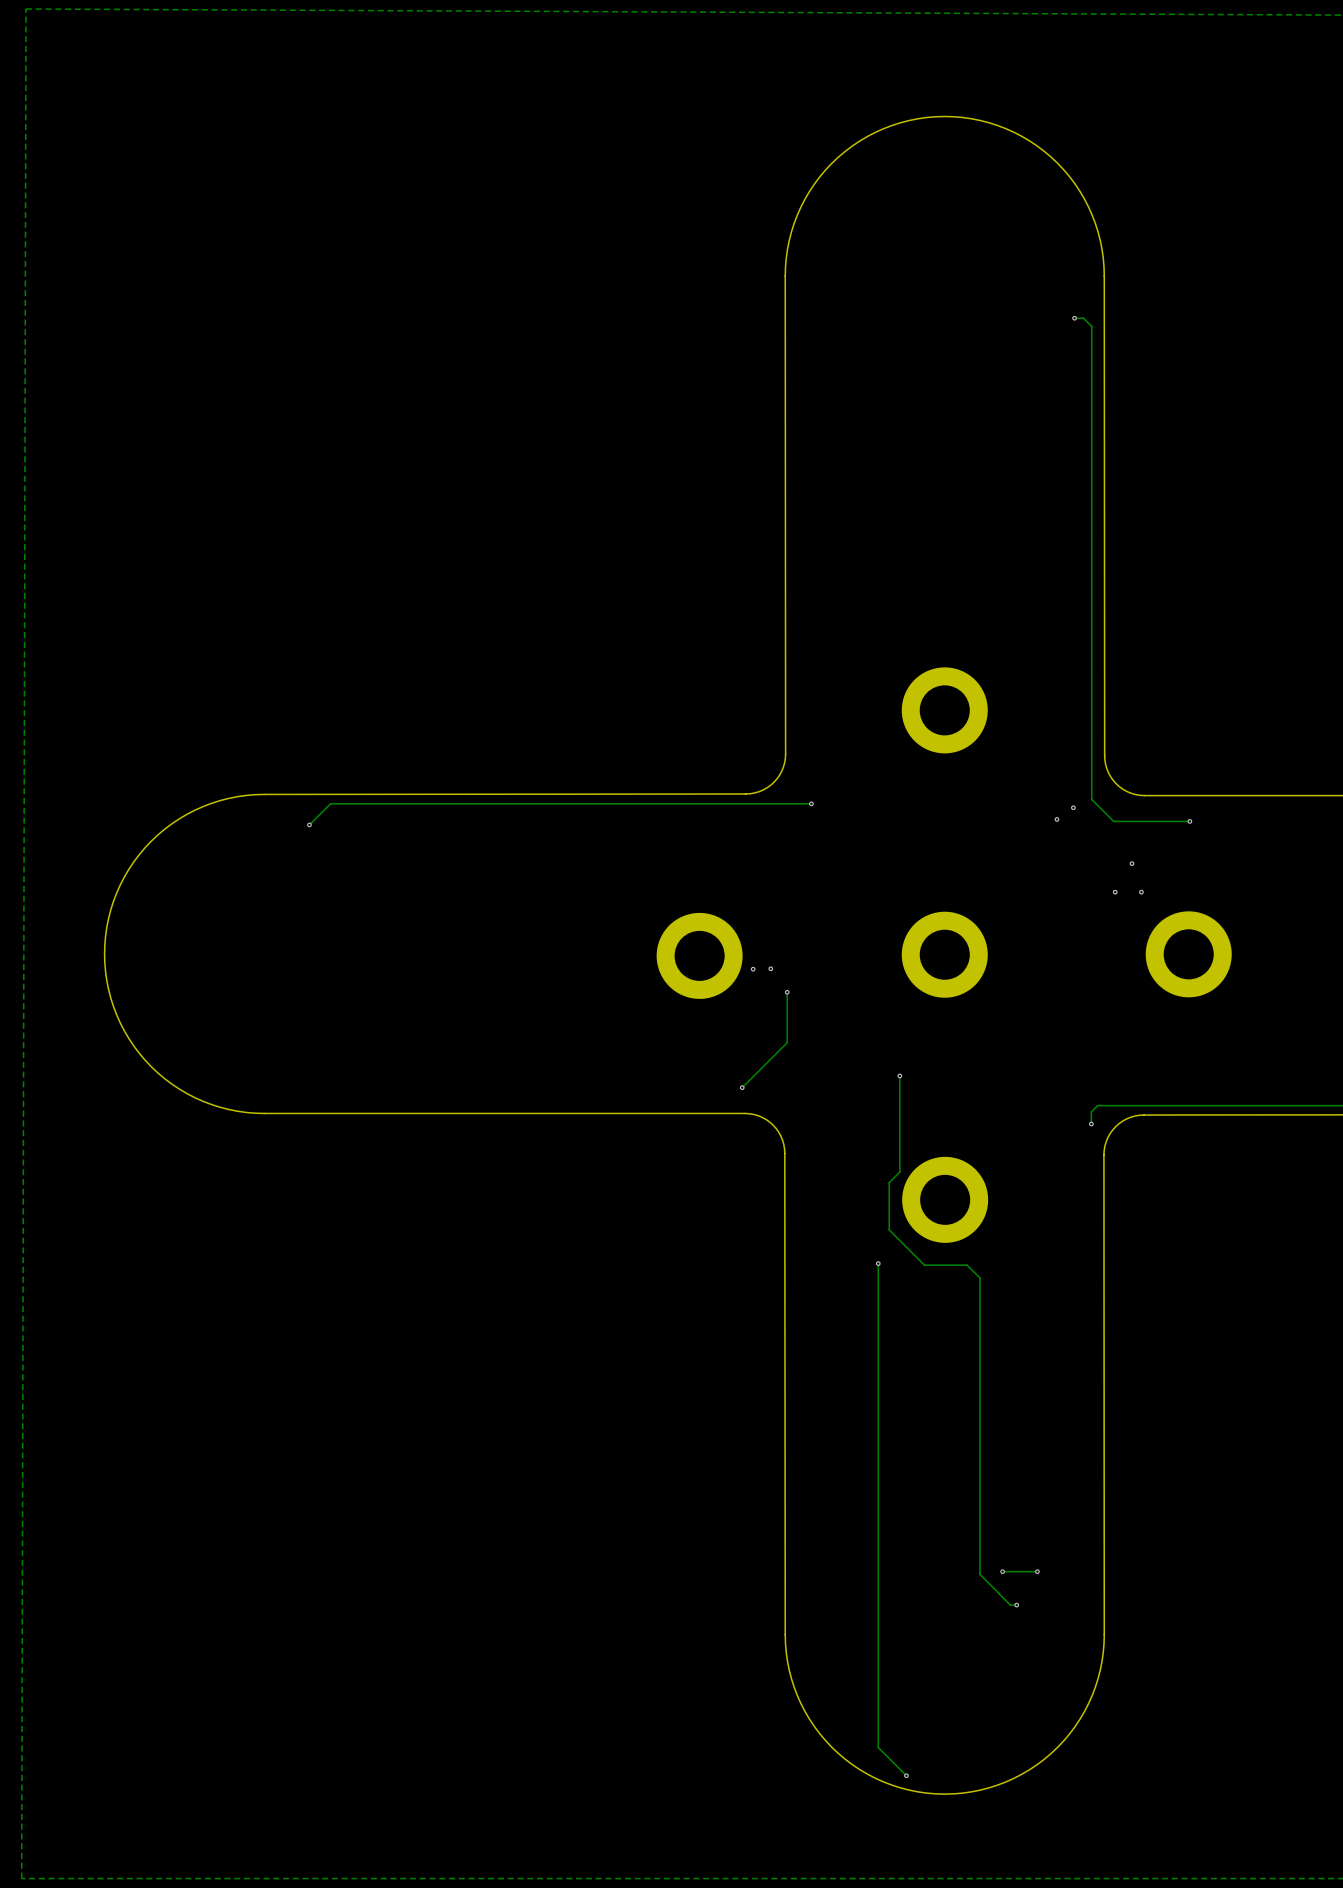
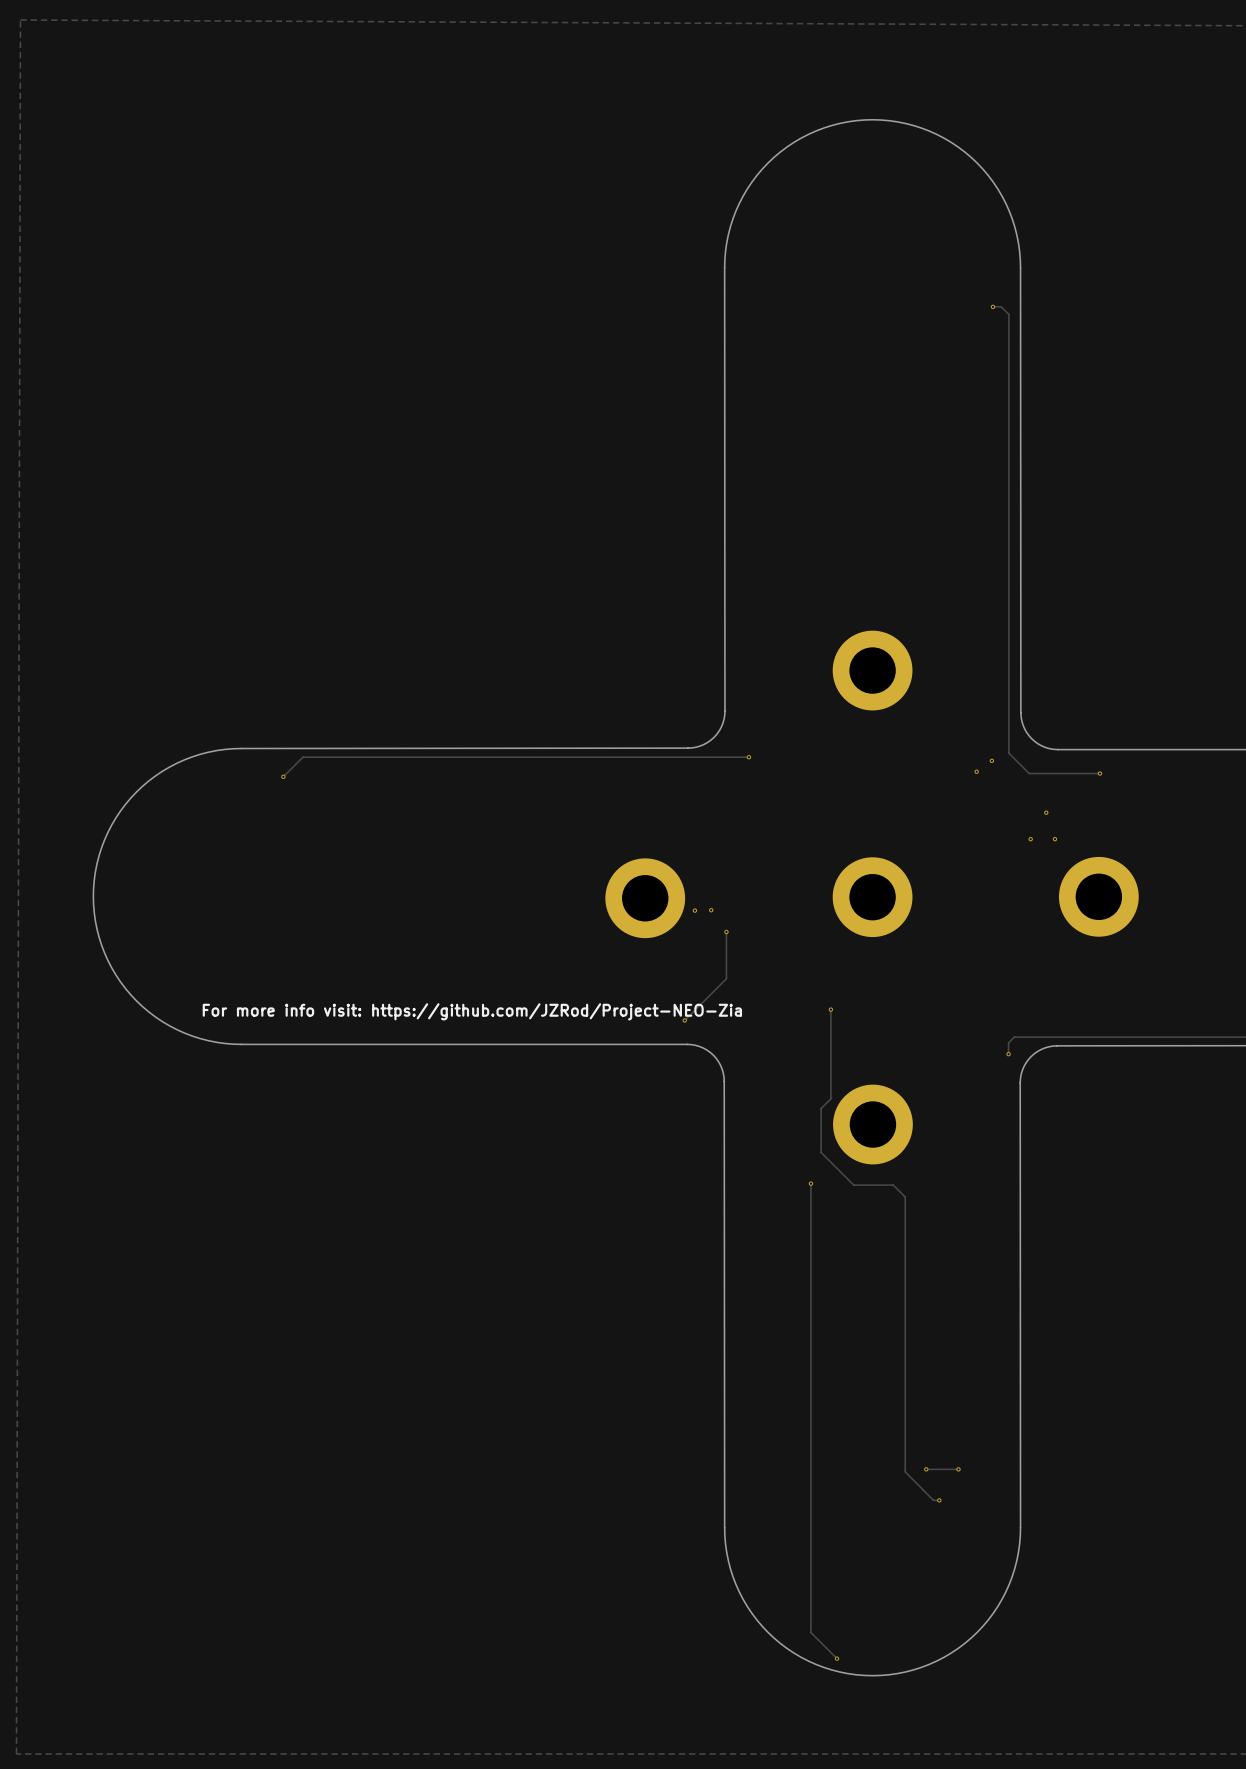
text: none -> For more info visit: https://github.com/JZRod/Project-NEO-Zia (472, 1011)

